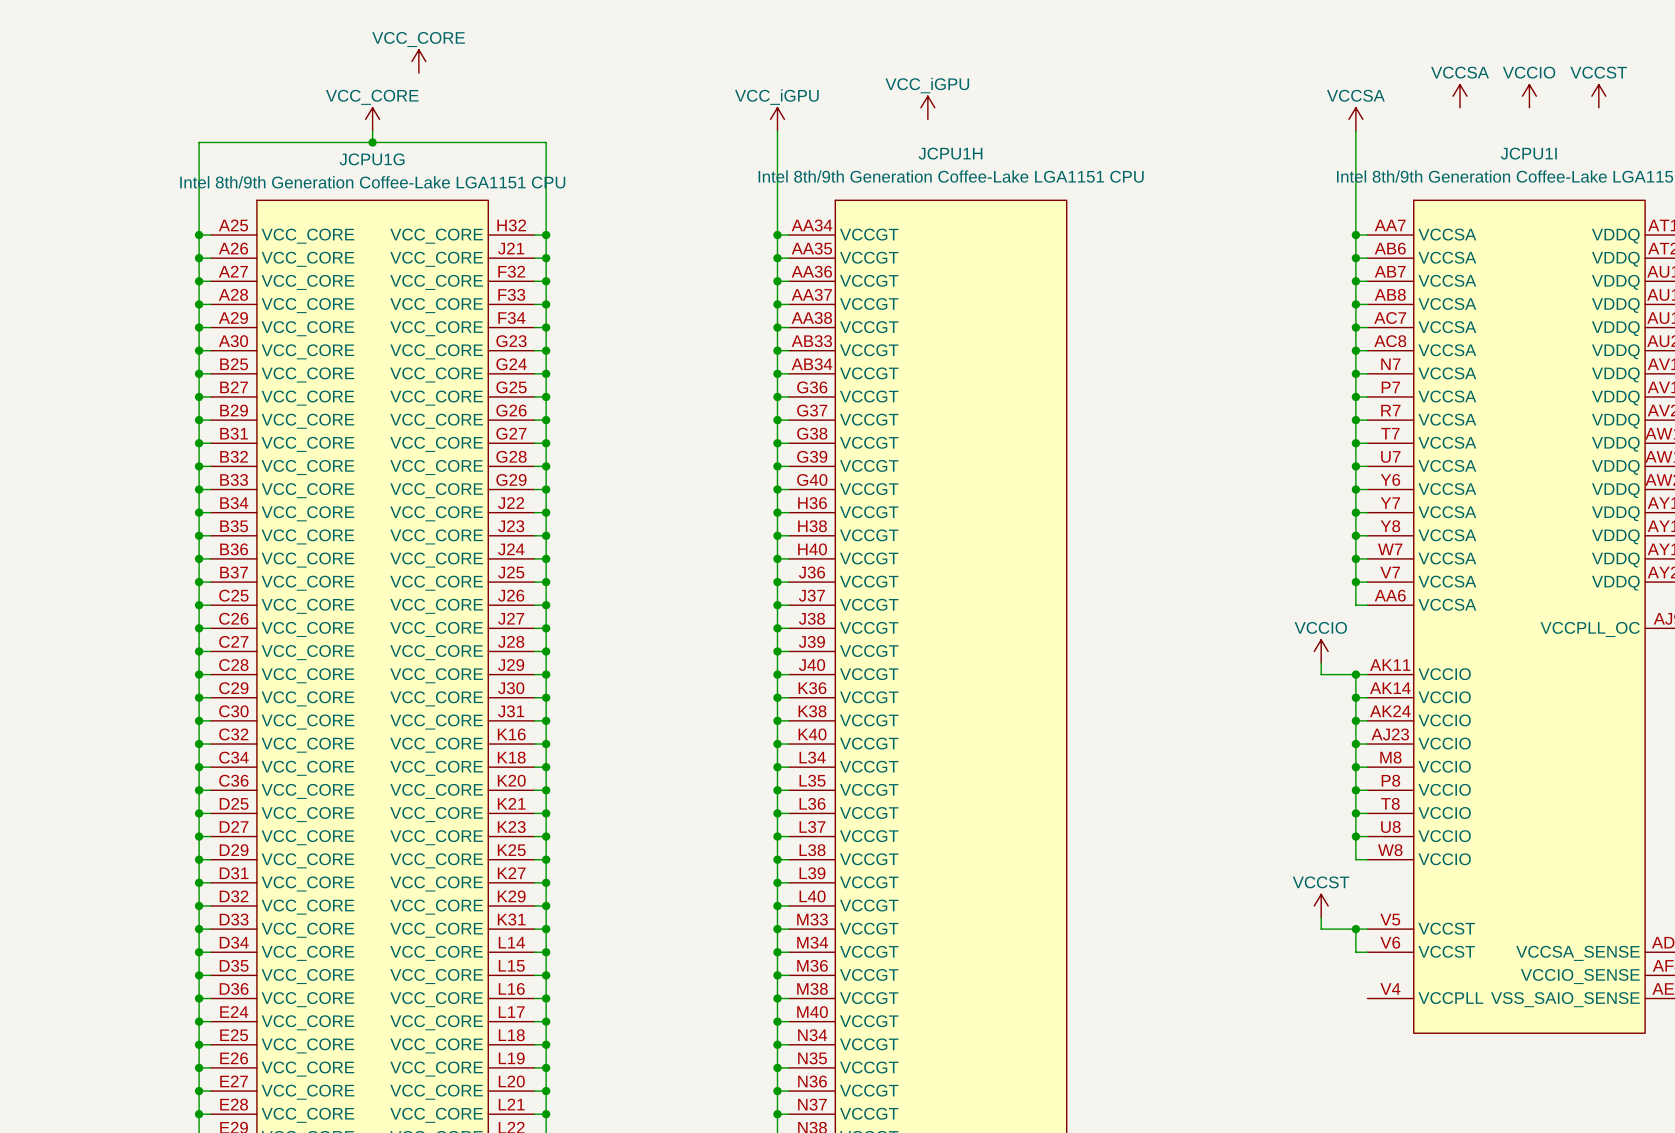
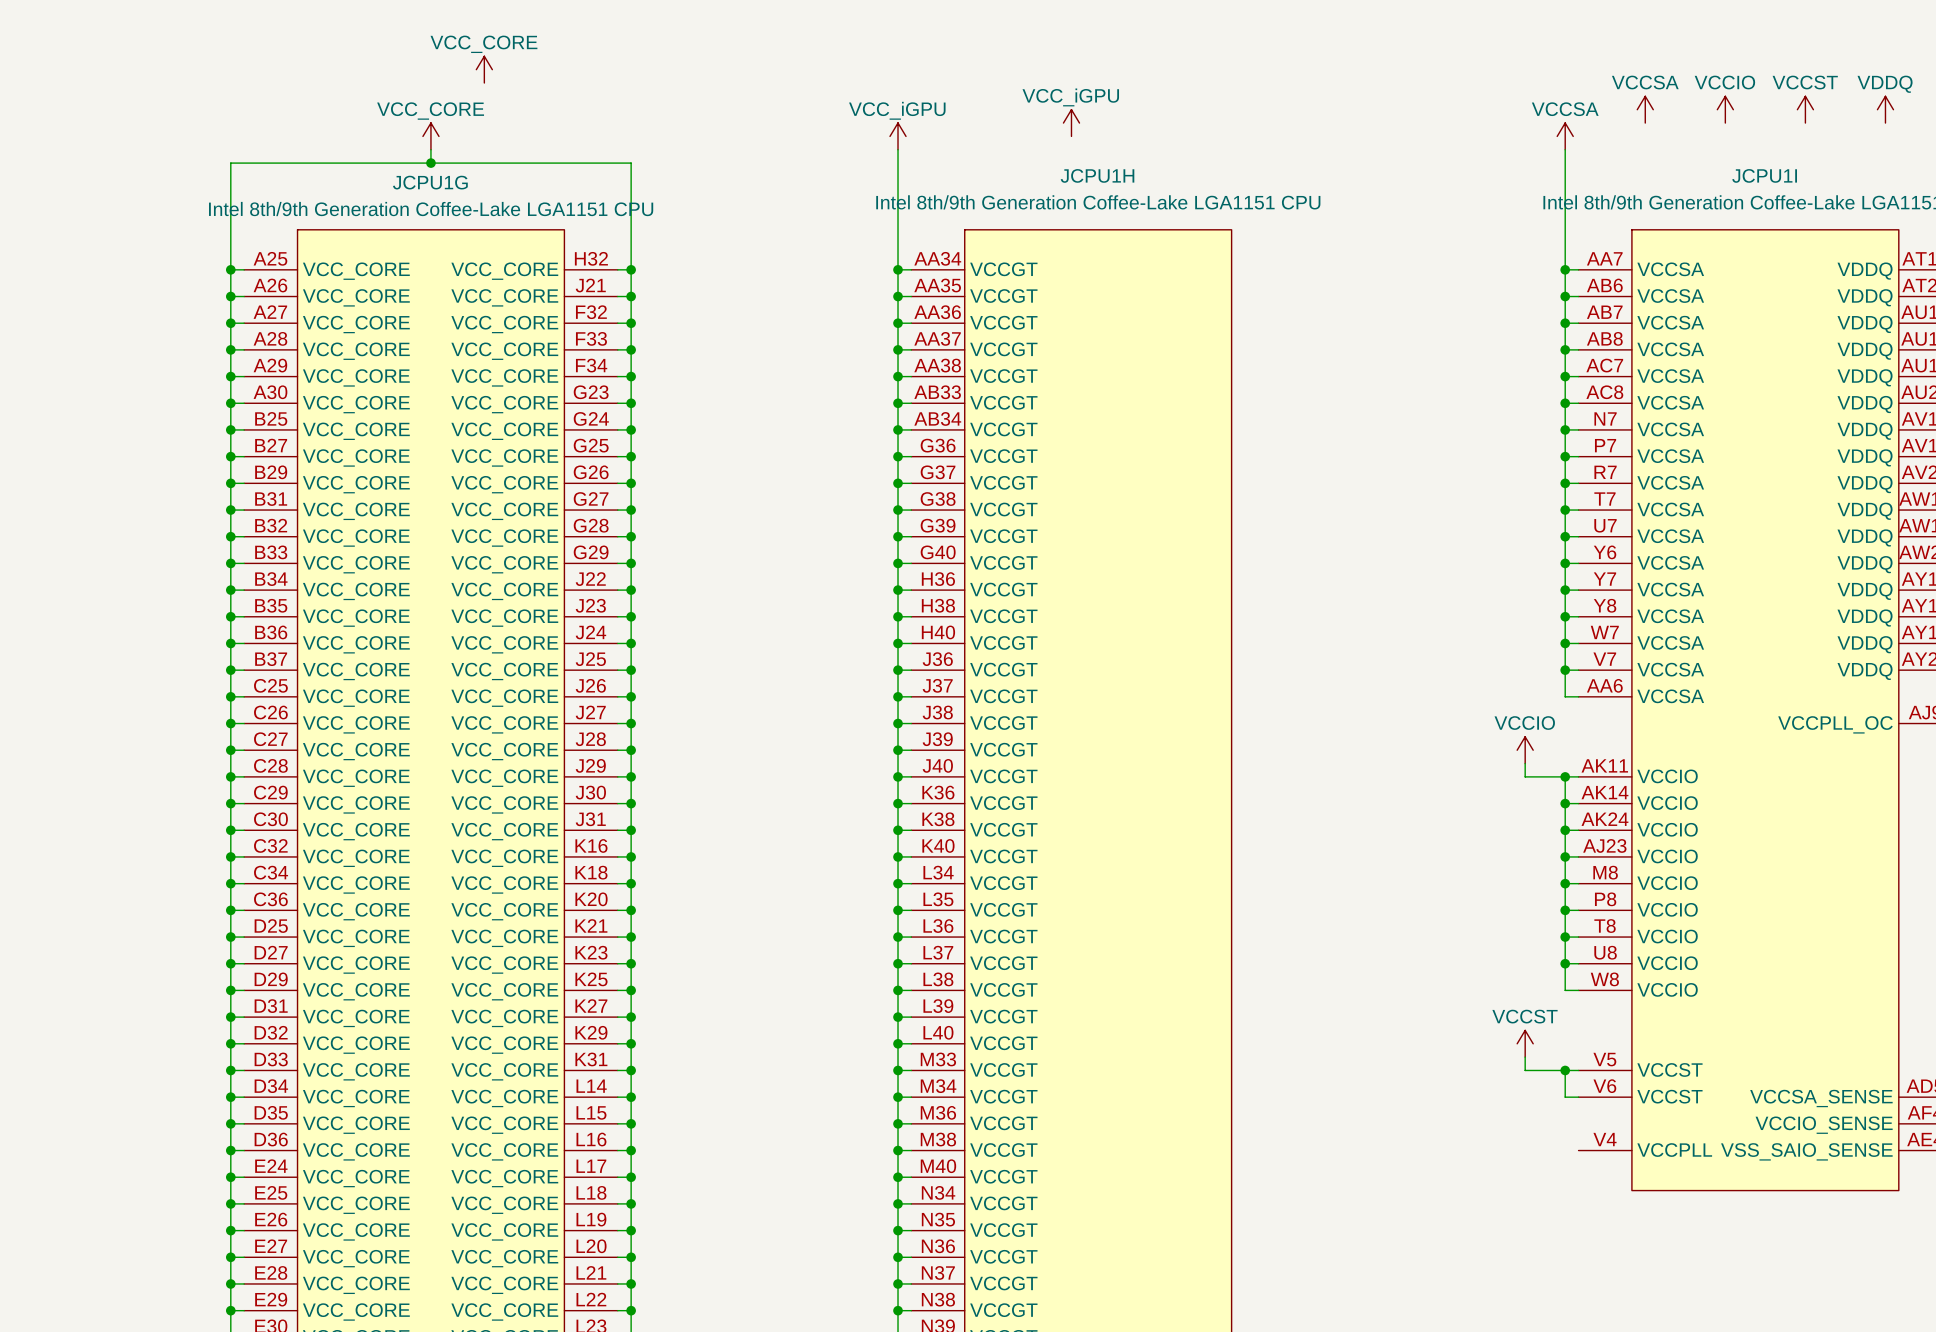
power symbol position: VCCSA (1460, 96) -> VCCSA (1645, 109)
power symbol position: VCCIO (1529, 96) -> VCCIO (1725, 109)
power symbol position: VCCST (1598, 96) -> VCCST (1805, 109)
power symbol: none -> VDDQ (1885, 109)

